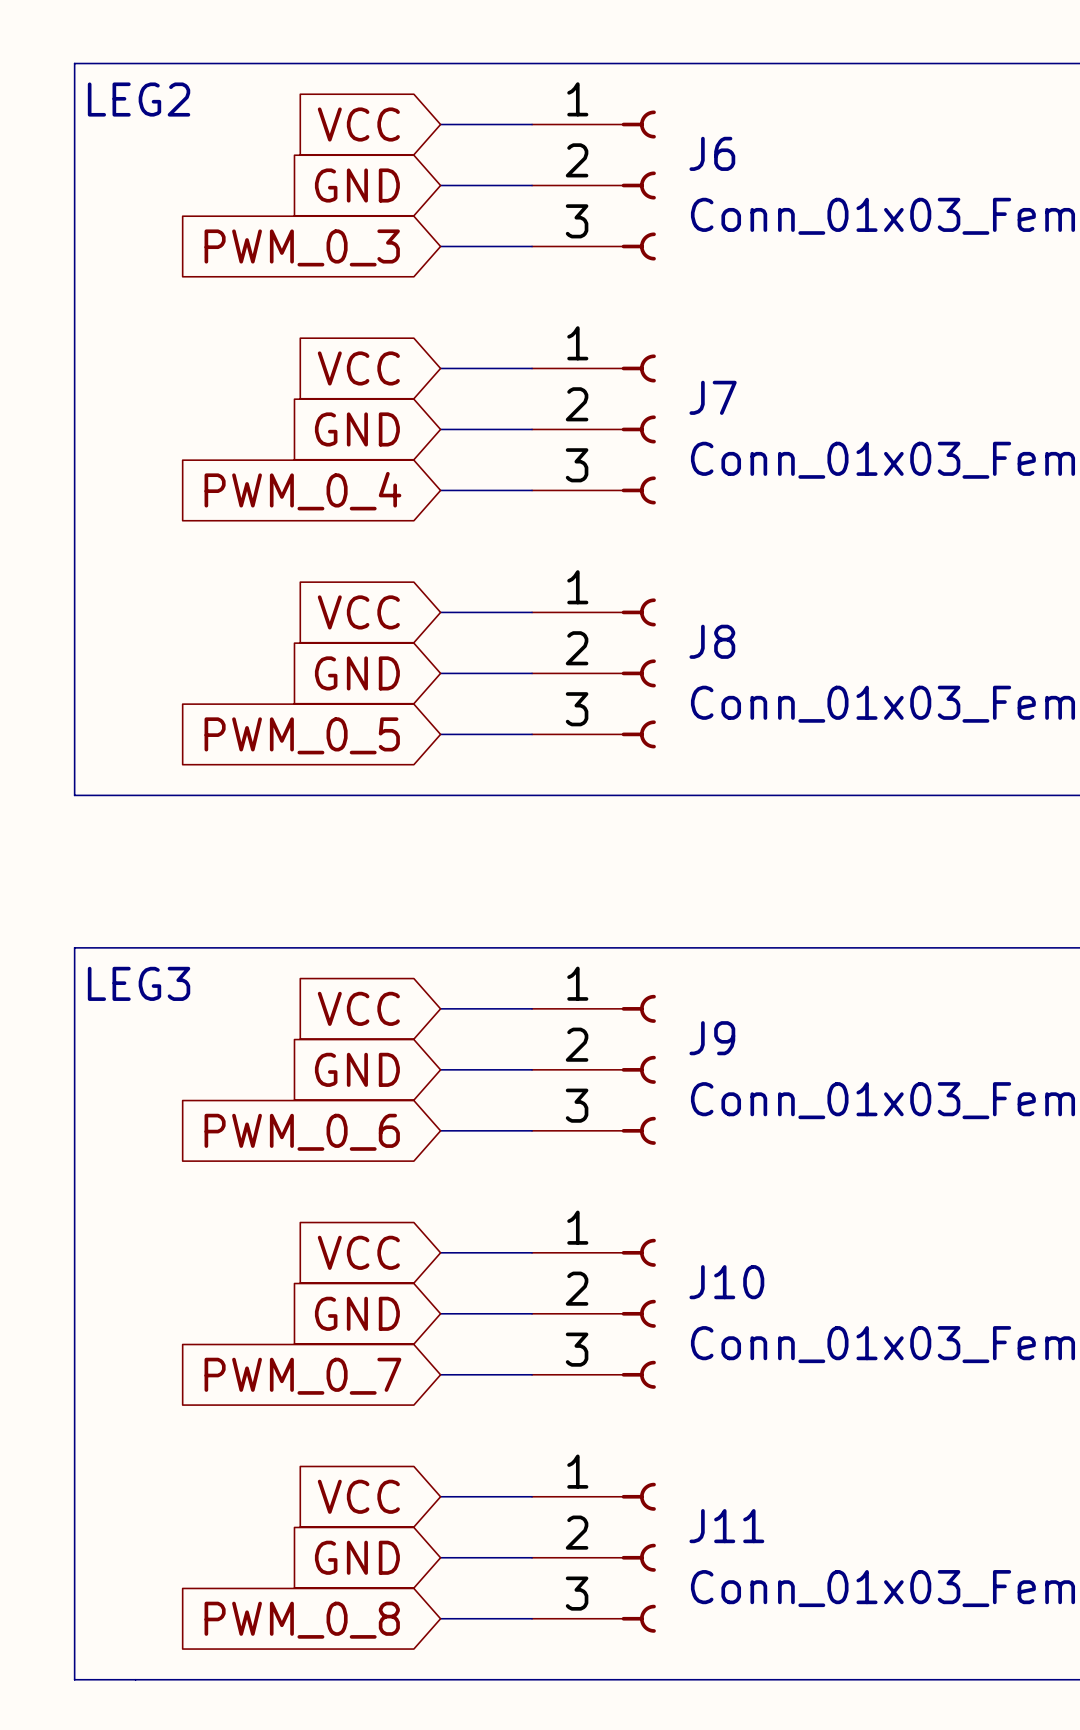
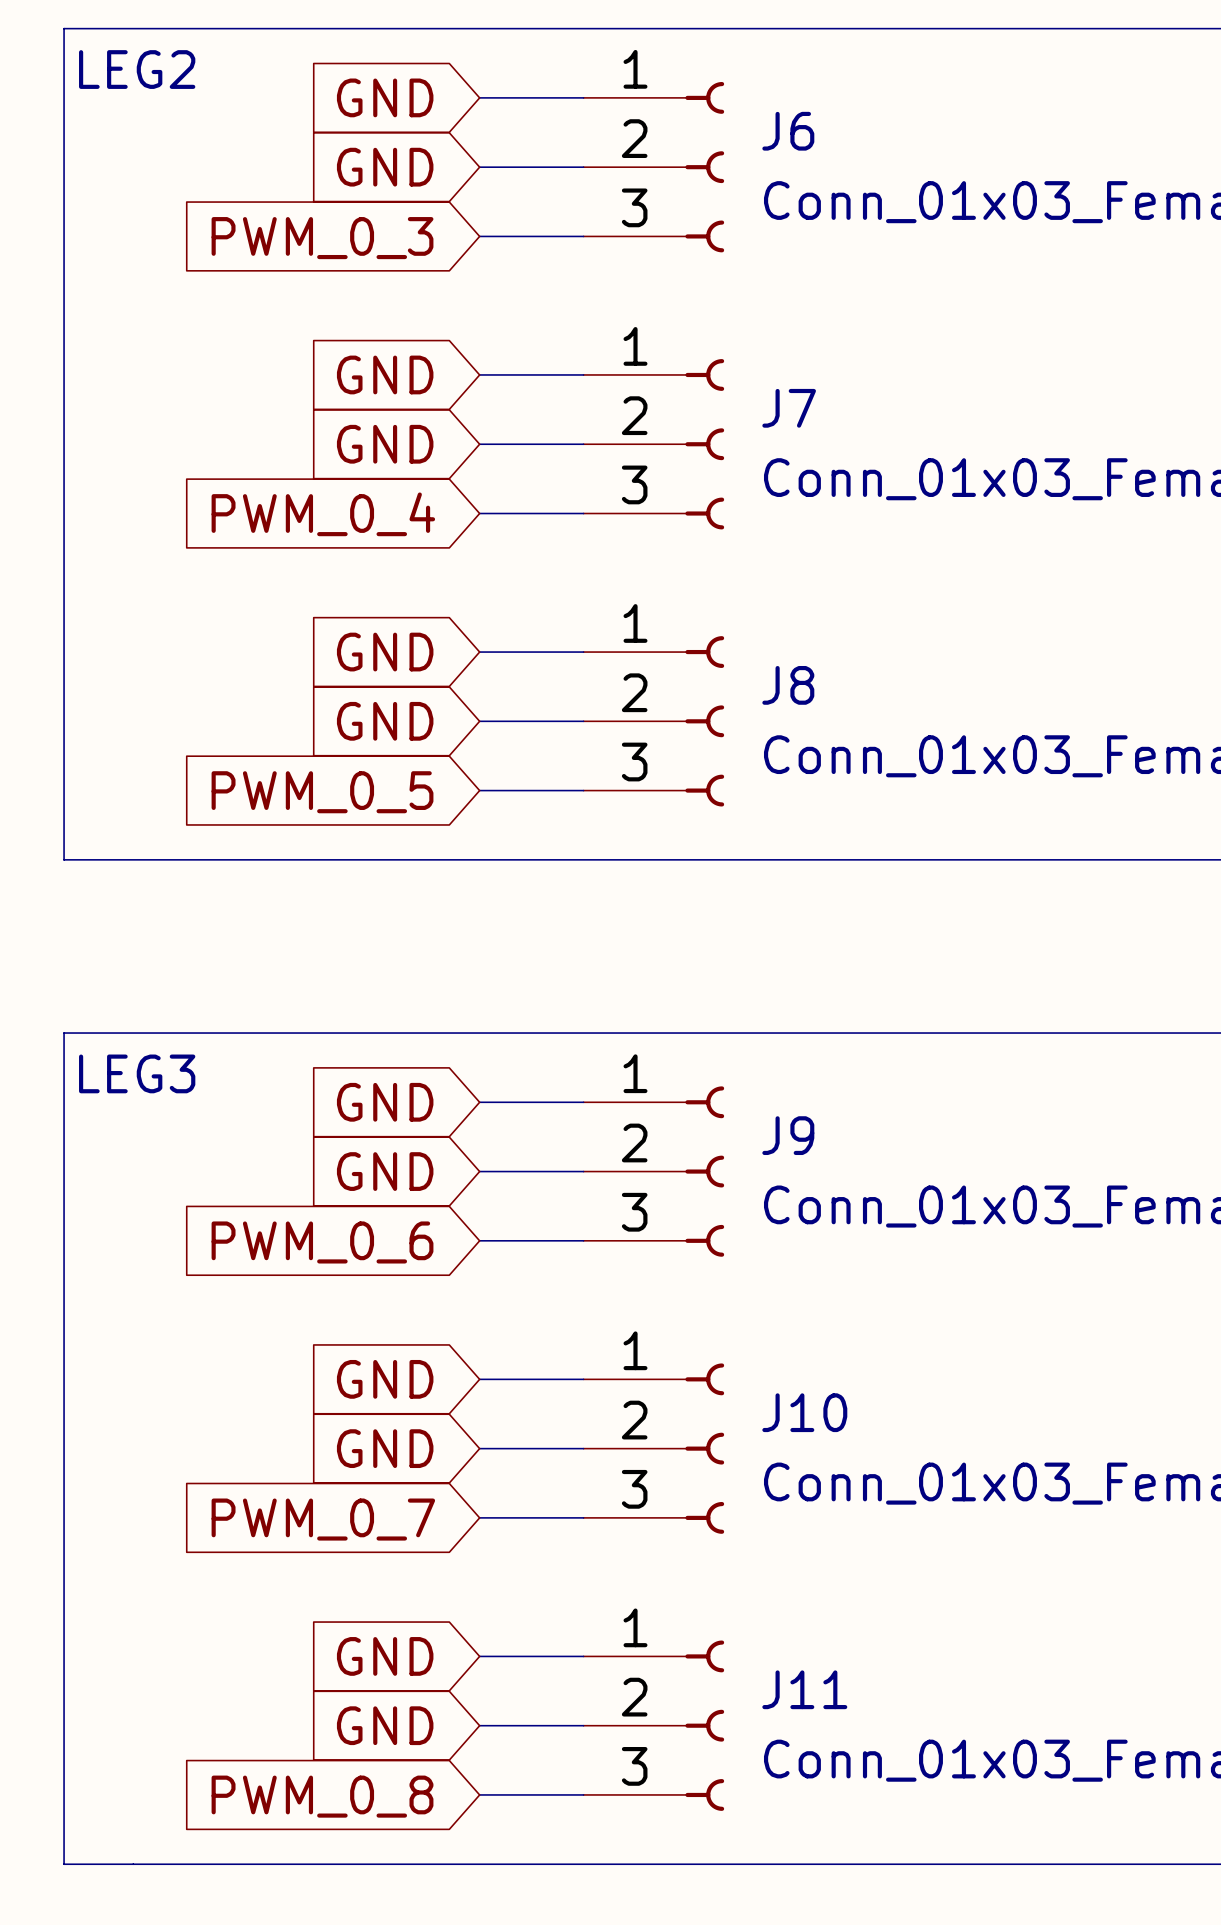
global label: VCC (358, 124) -> GND (385, 97)
global label: VCC (358, 368) -> GND (385, 374)
global label: VCC (358, 612) -> GND (385, 652)
global label: VCC (358, 1008) -> GND (385, 1102)
global label: VCC (358, 1252) -> GND (385, 1379)
global label: VCC (358, 1496) -> GND (385, 1656)

